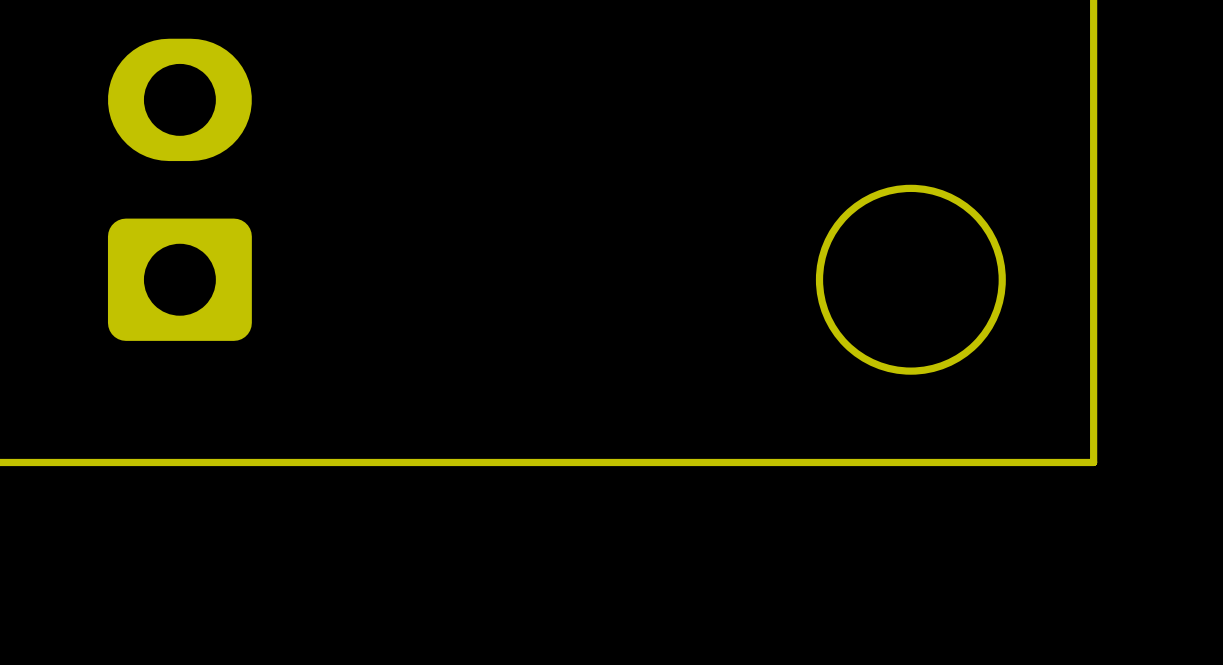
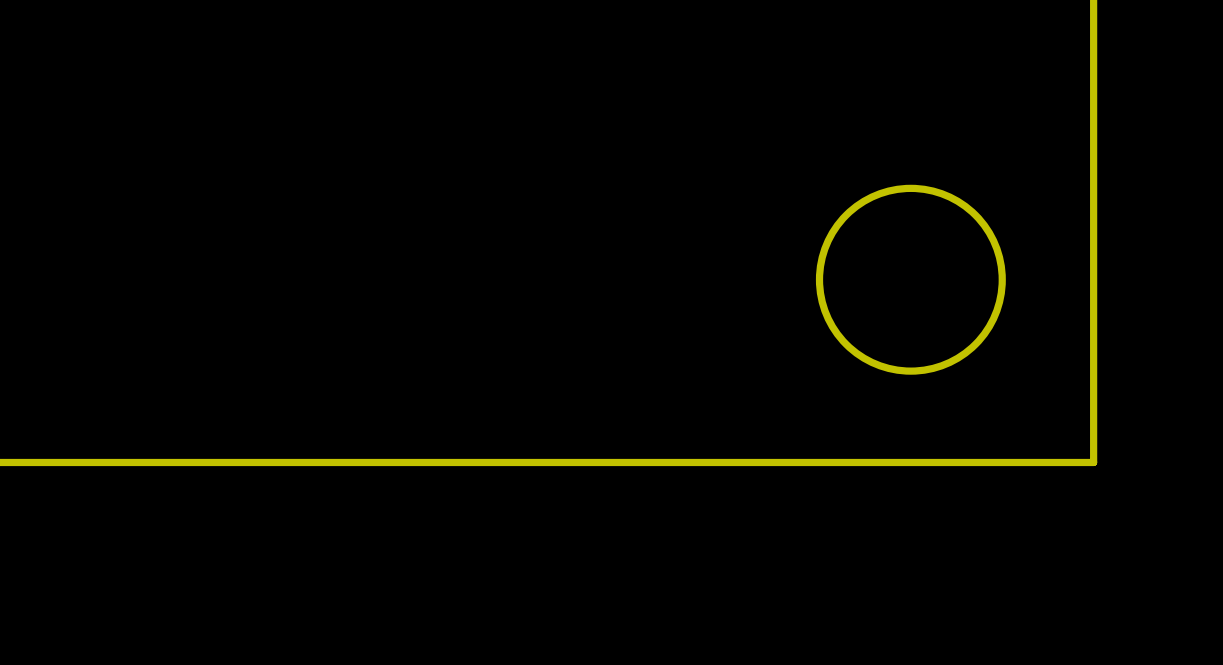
part: (179, 189) -> none

